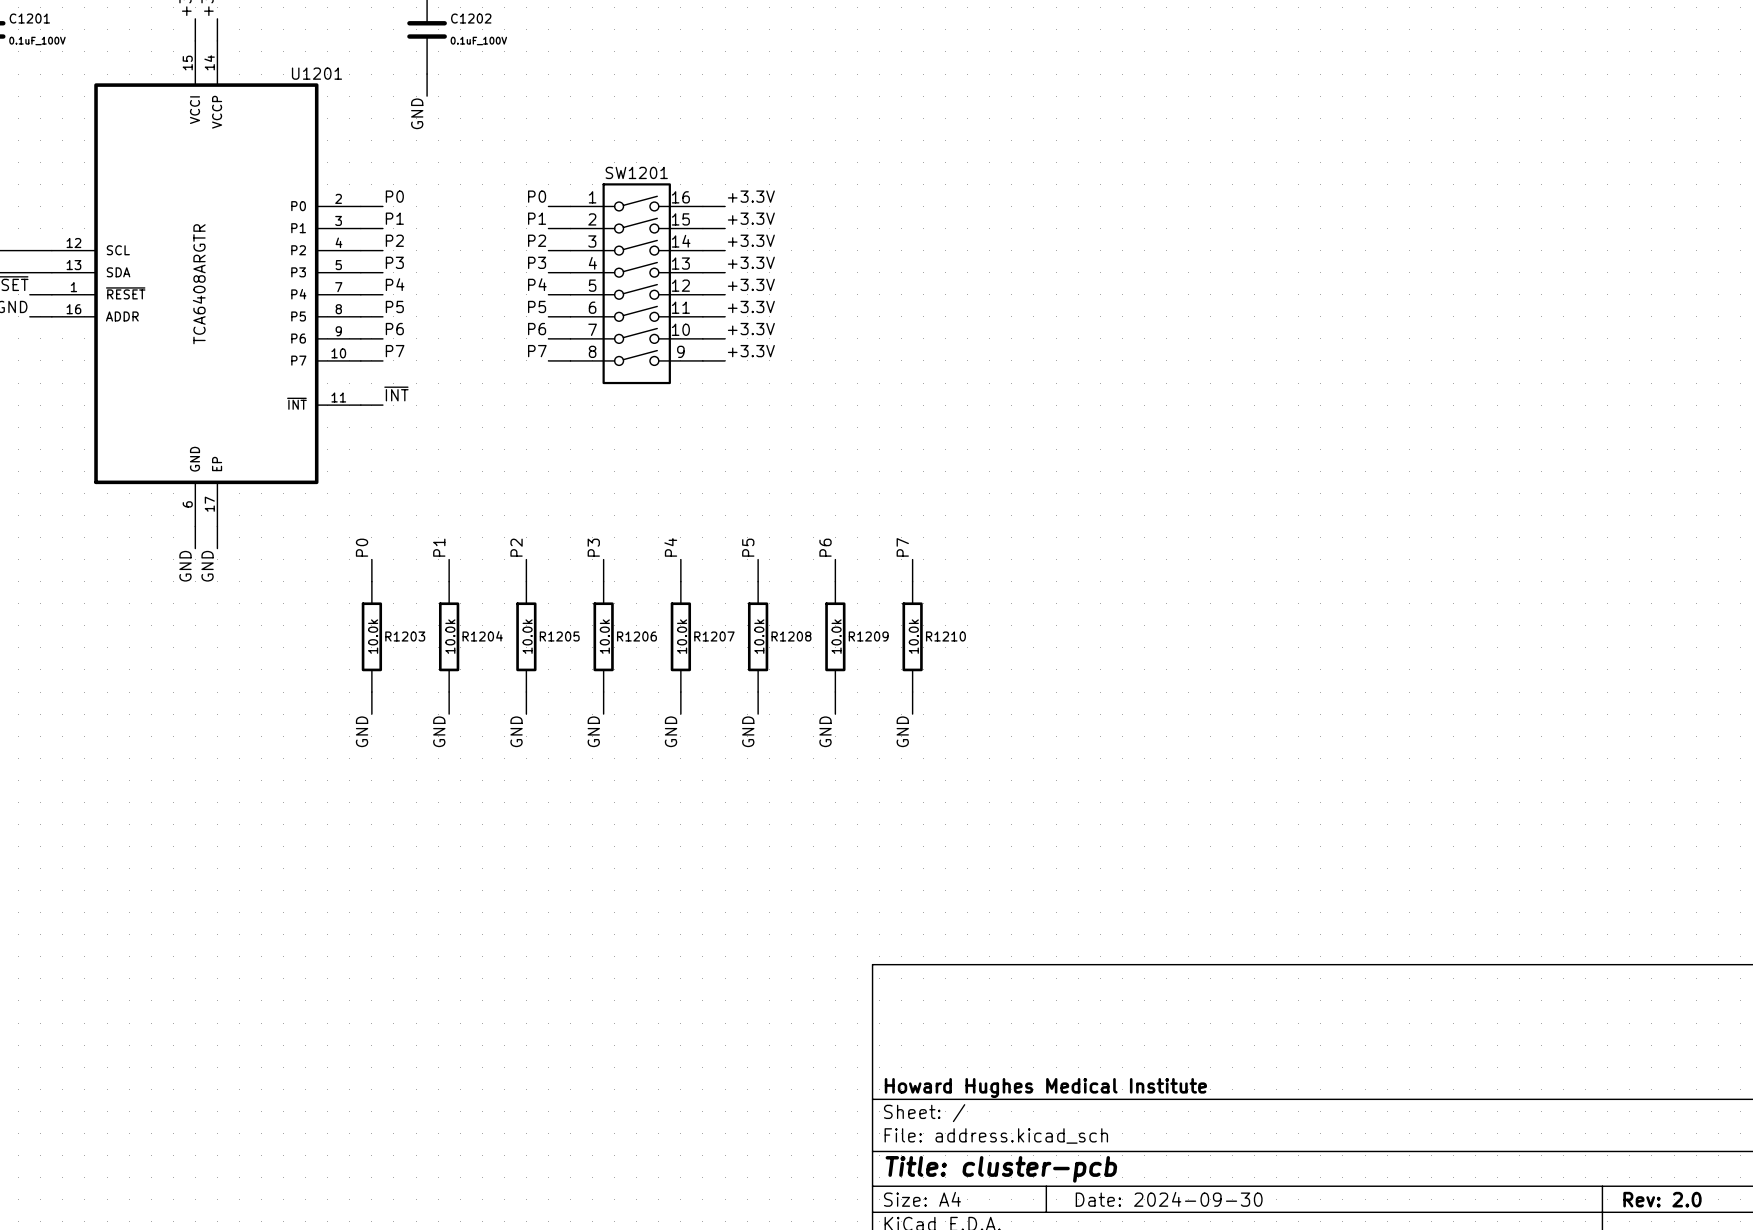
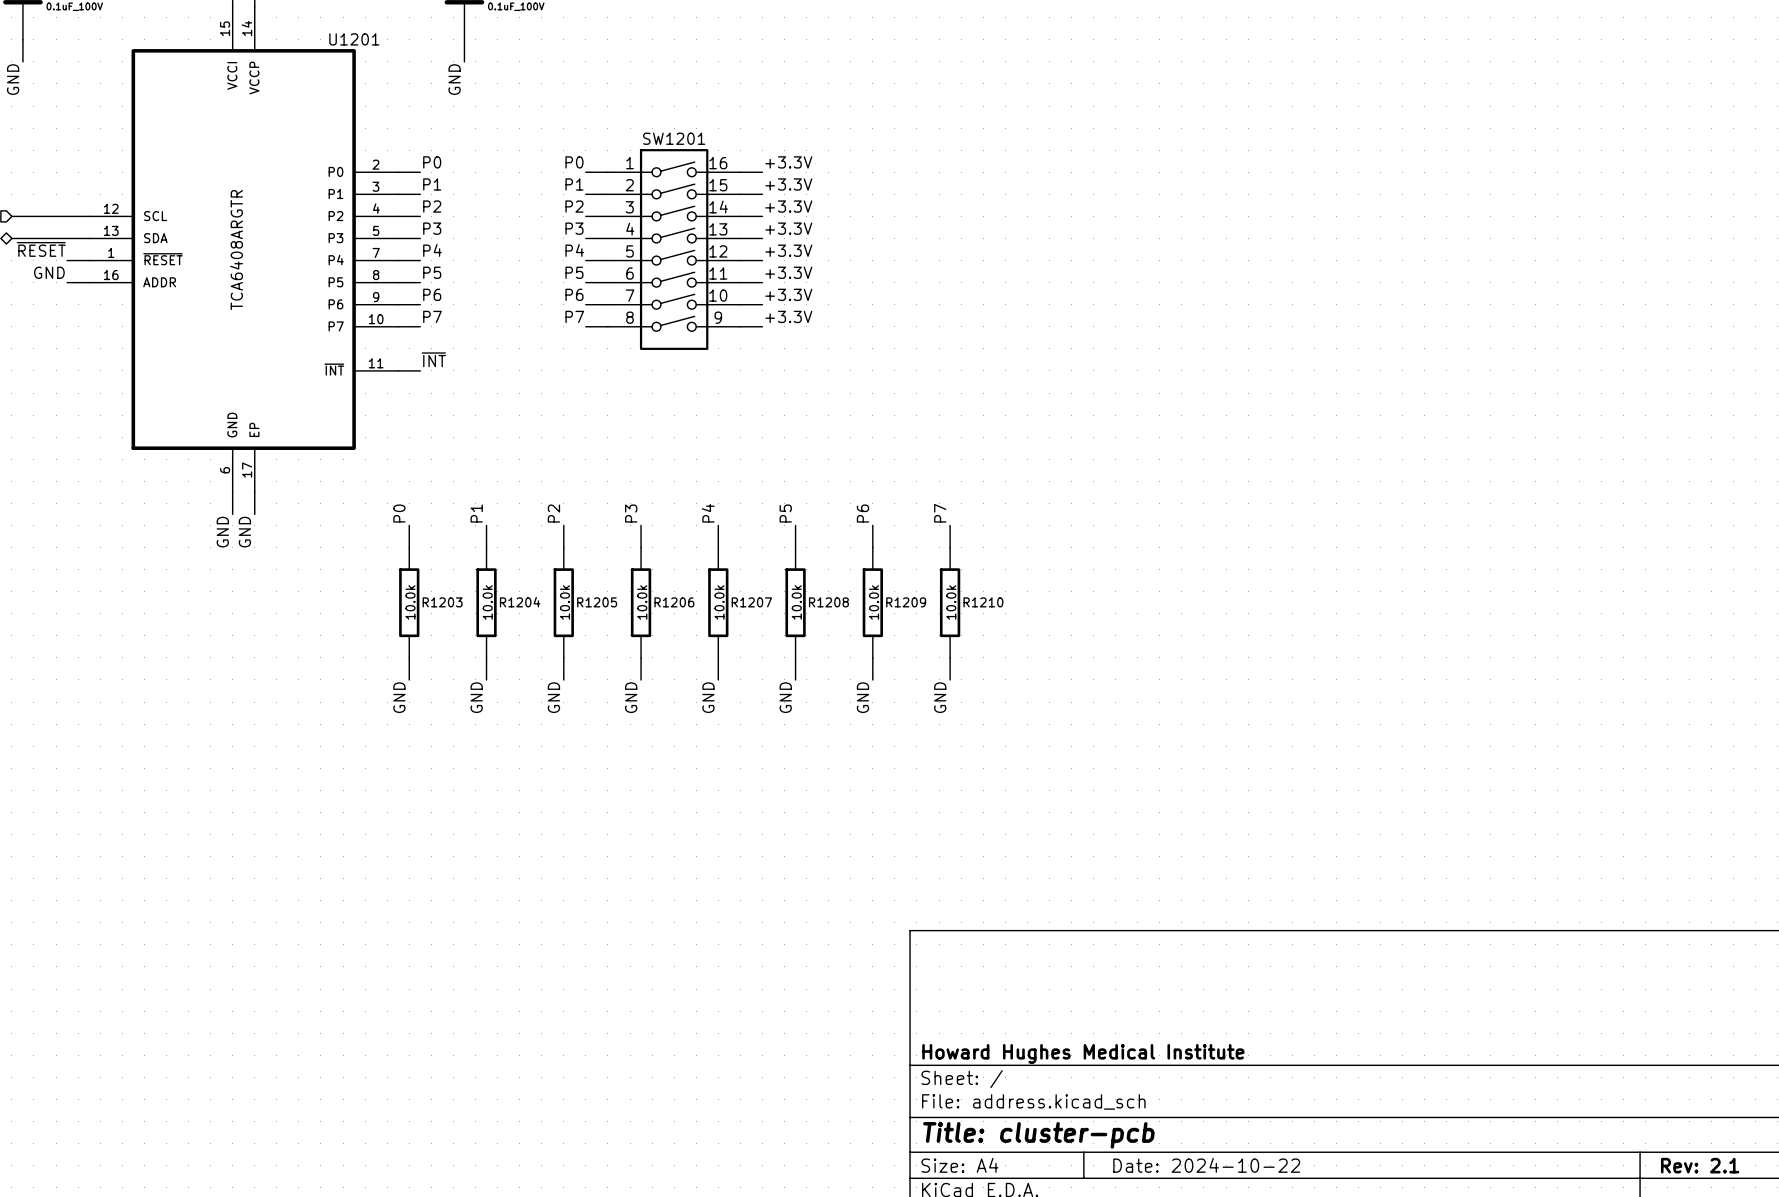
title block: Date: 2024-09-30 (1169, 1199) -> Date: 2024-10-22 (1206, 1165)
title block: Rev: 2.0 (1662, 1199) -> Rev: 2.1 (1700, 1165)

